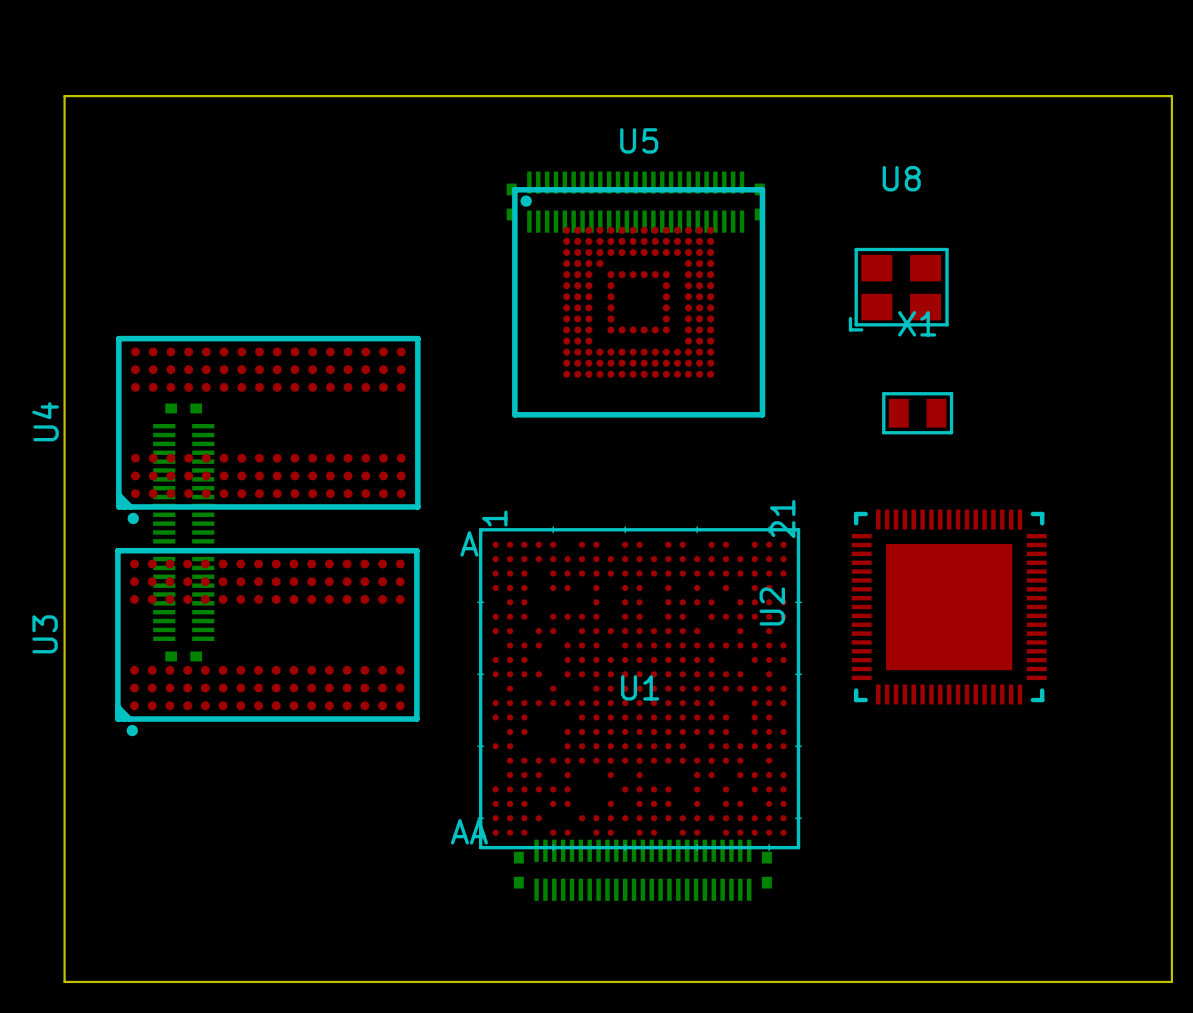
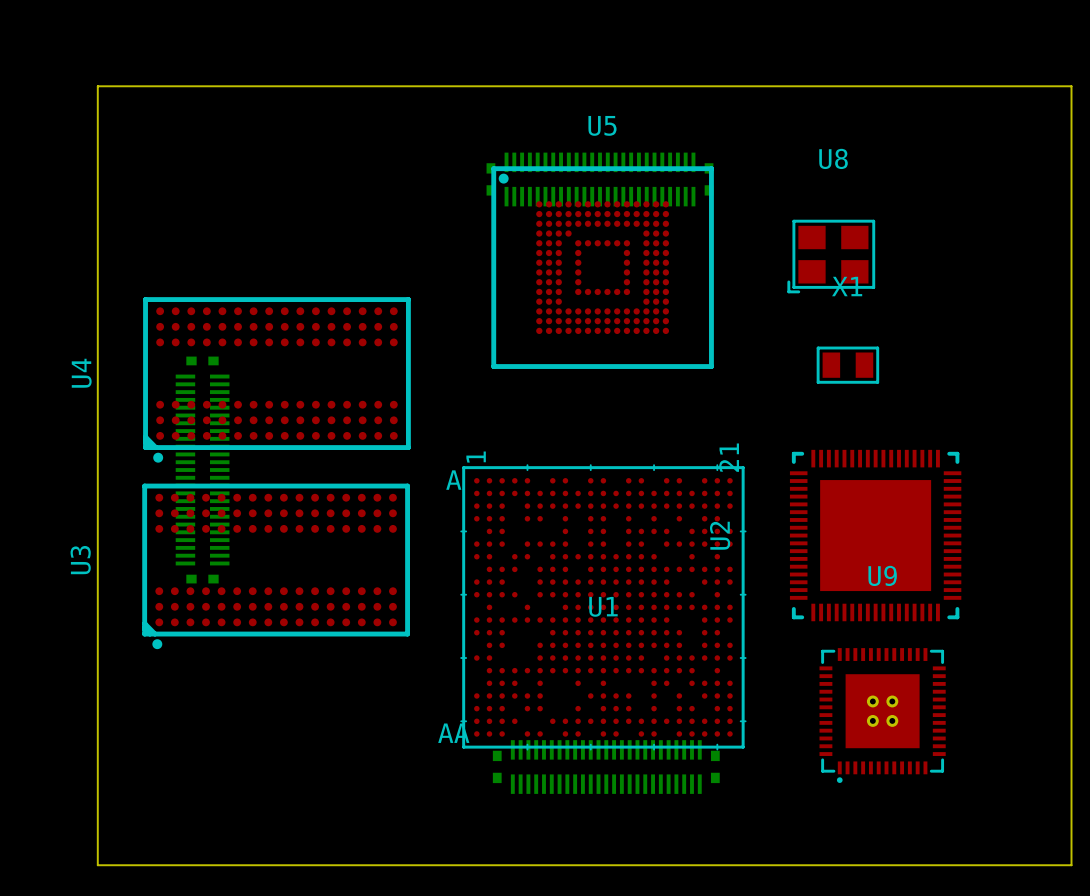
U9: none -> (882, 715)

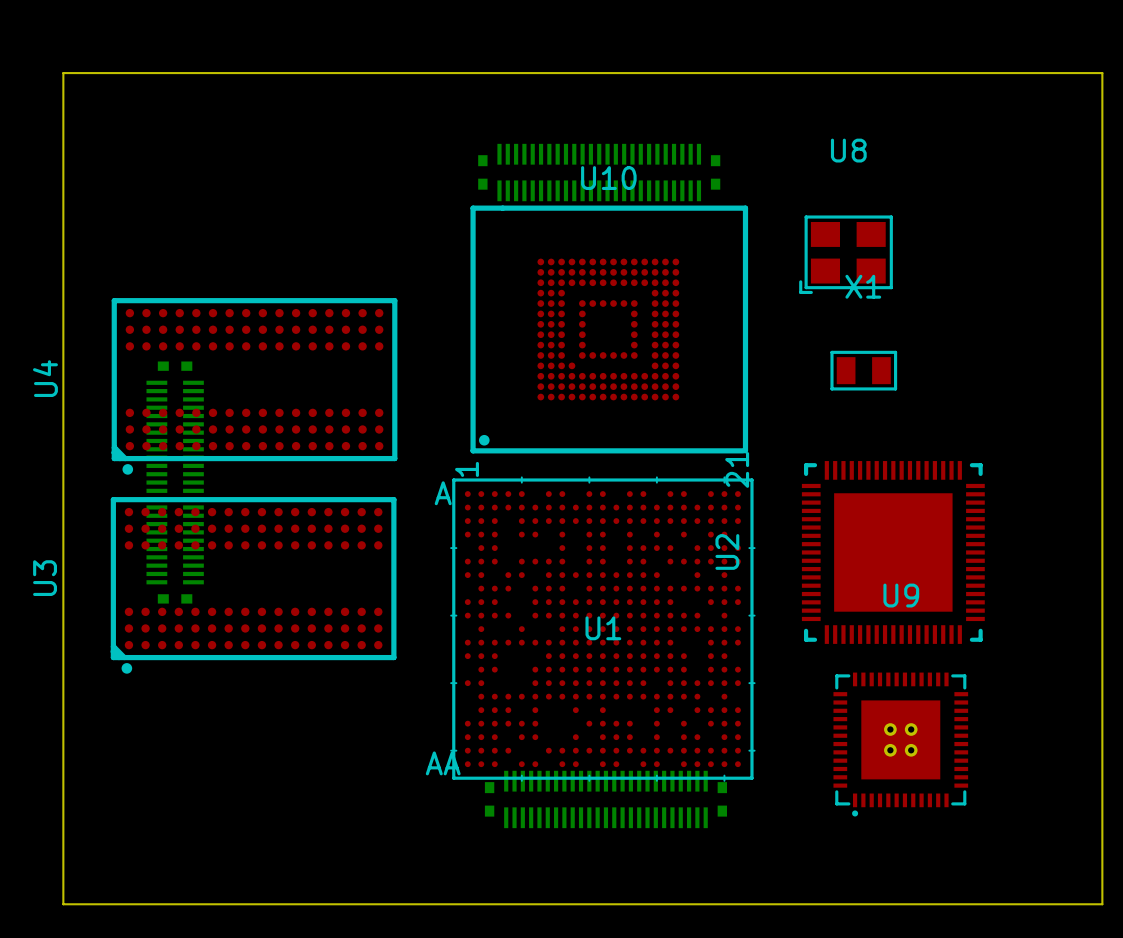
U5: (602, 267) -> none
U10: none -> (609, 329)

